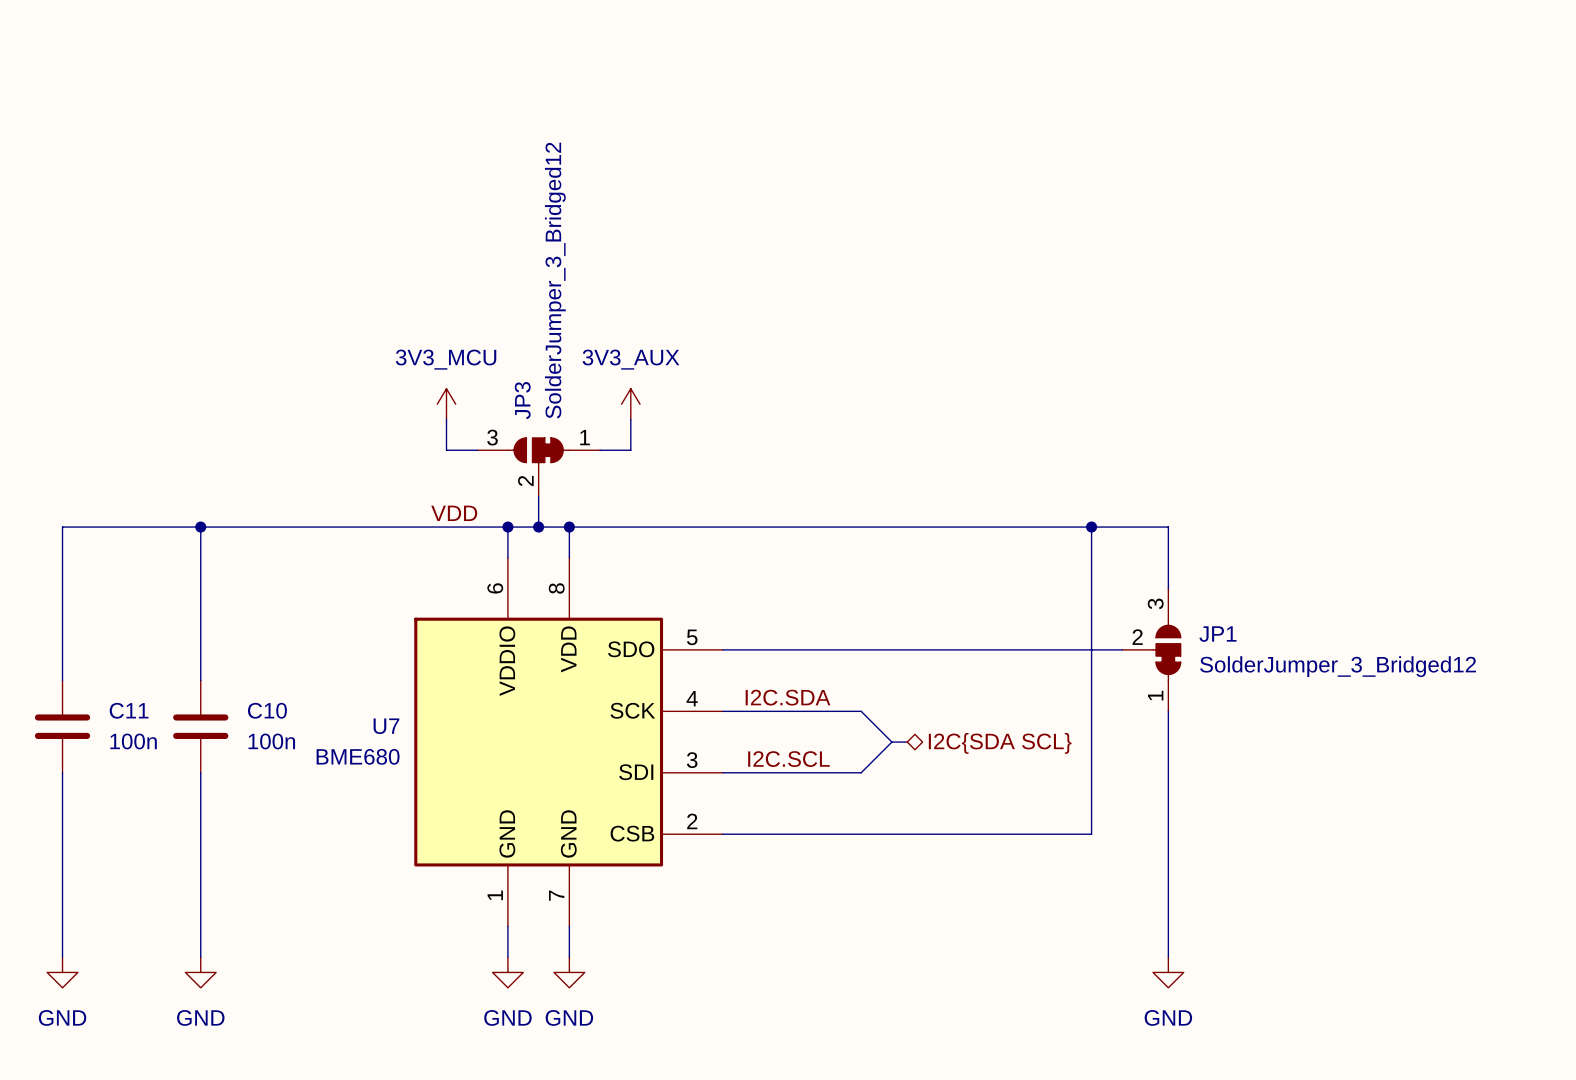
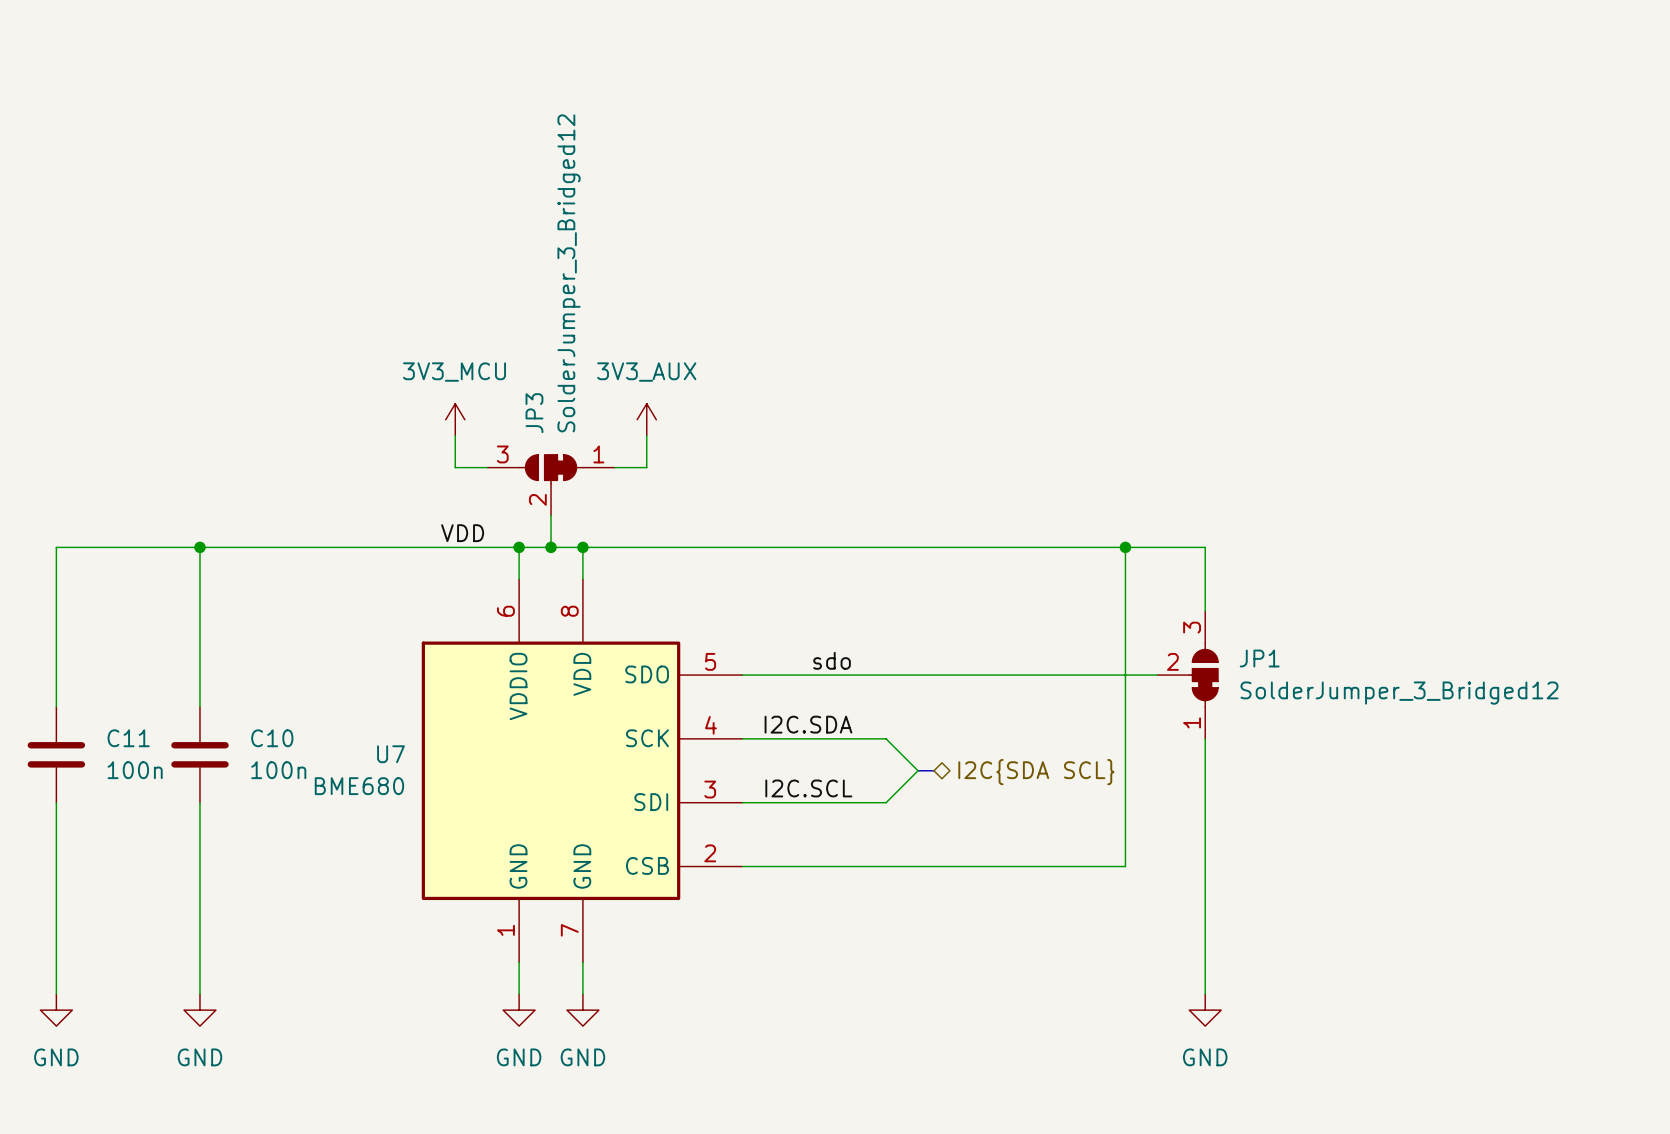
label: none -> sdo (832, 660)

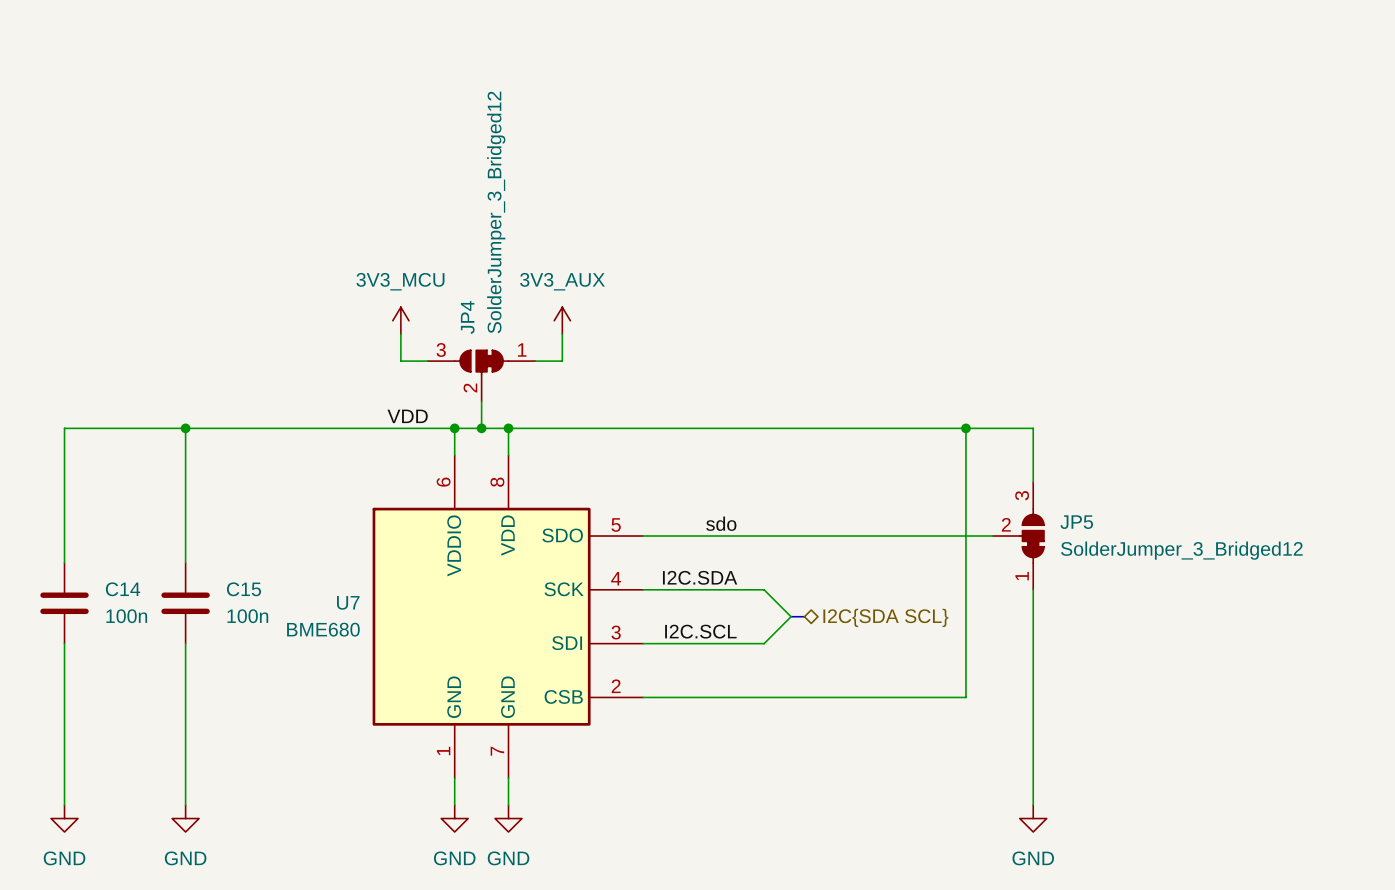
JP3 name: JP3 (534, 413) -> JP4 (467, 317)
JP1 name: JP1 (1259, 658) -> JP5 (1076, 522)
C11 name: C11 (128, 738) -> C14 (123, 589)
C10 name: C10 (272, 738) -> C15 (243, 589)

